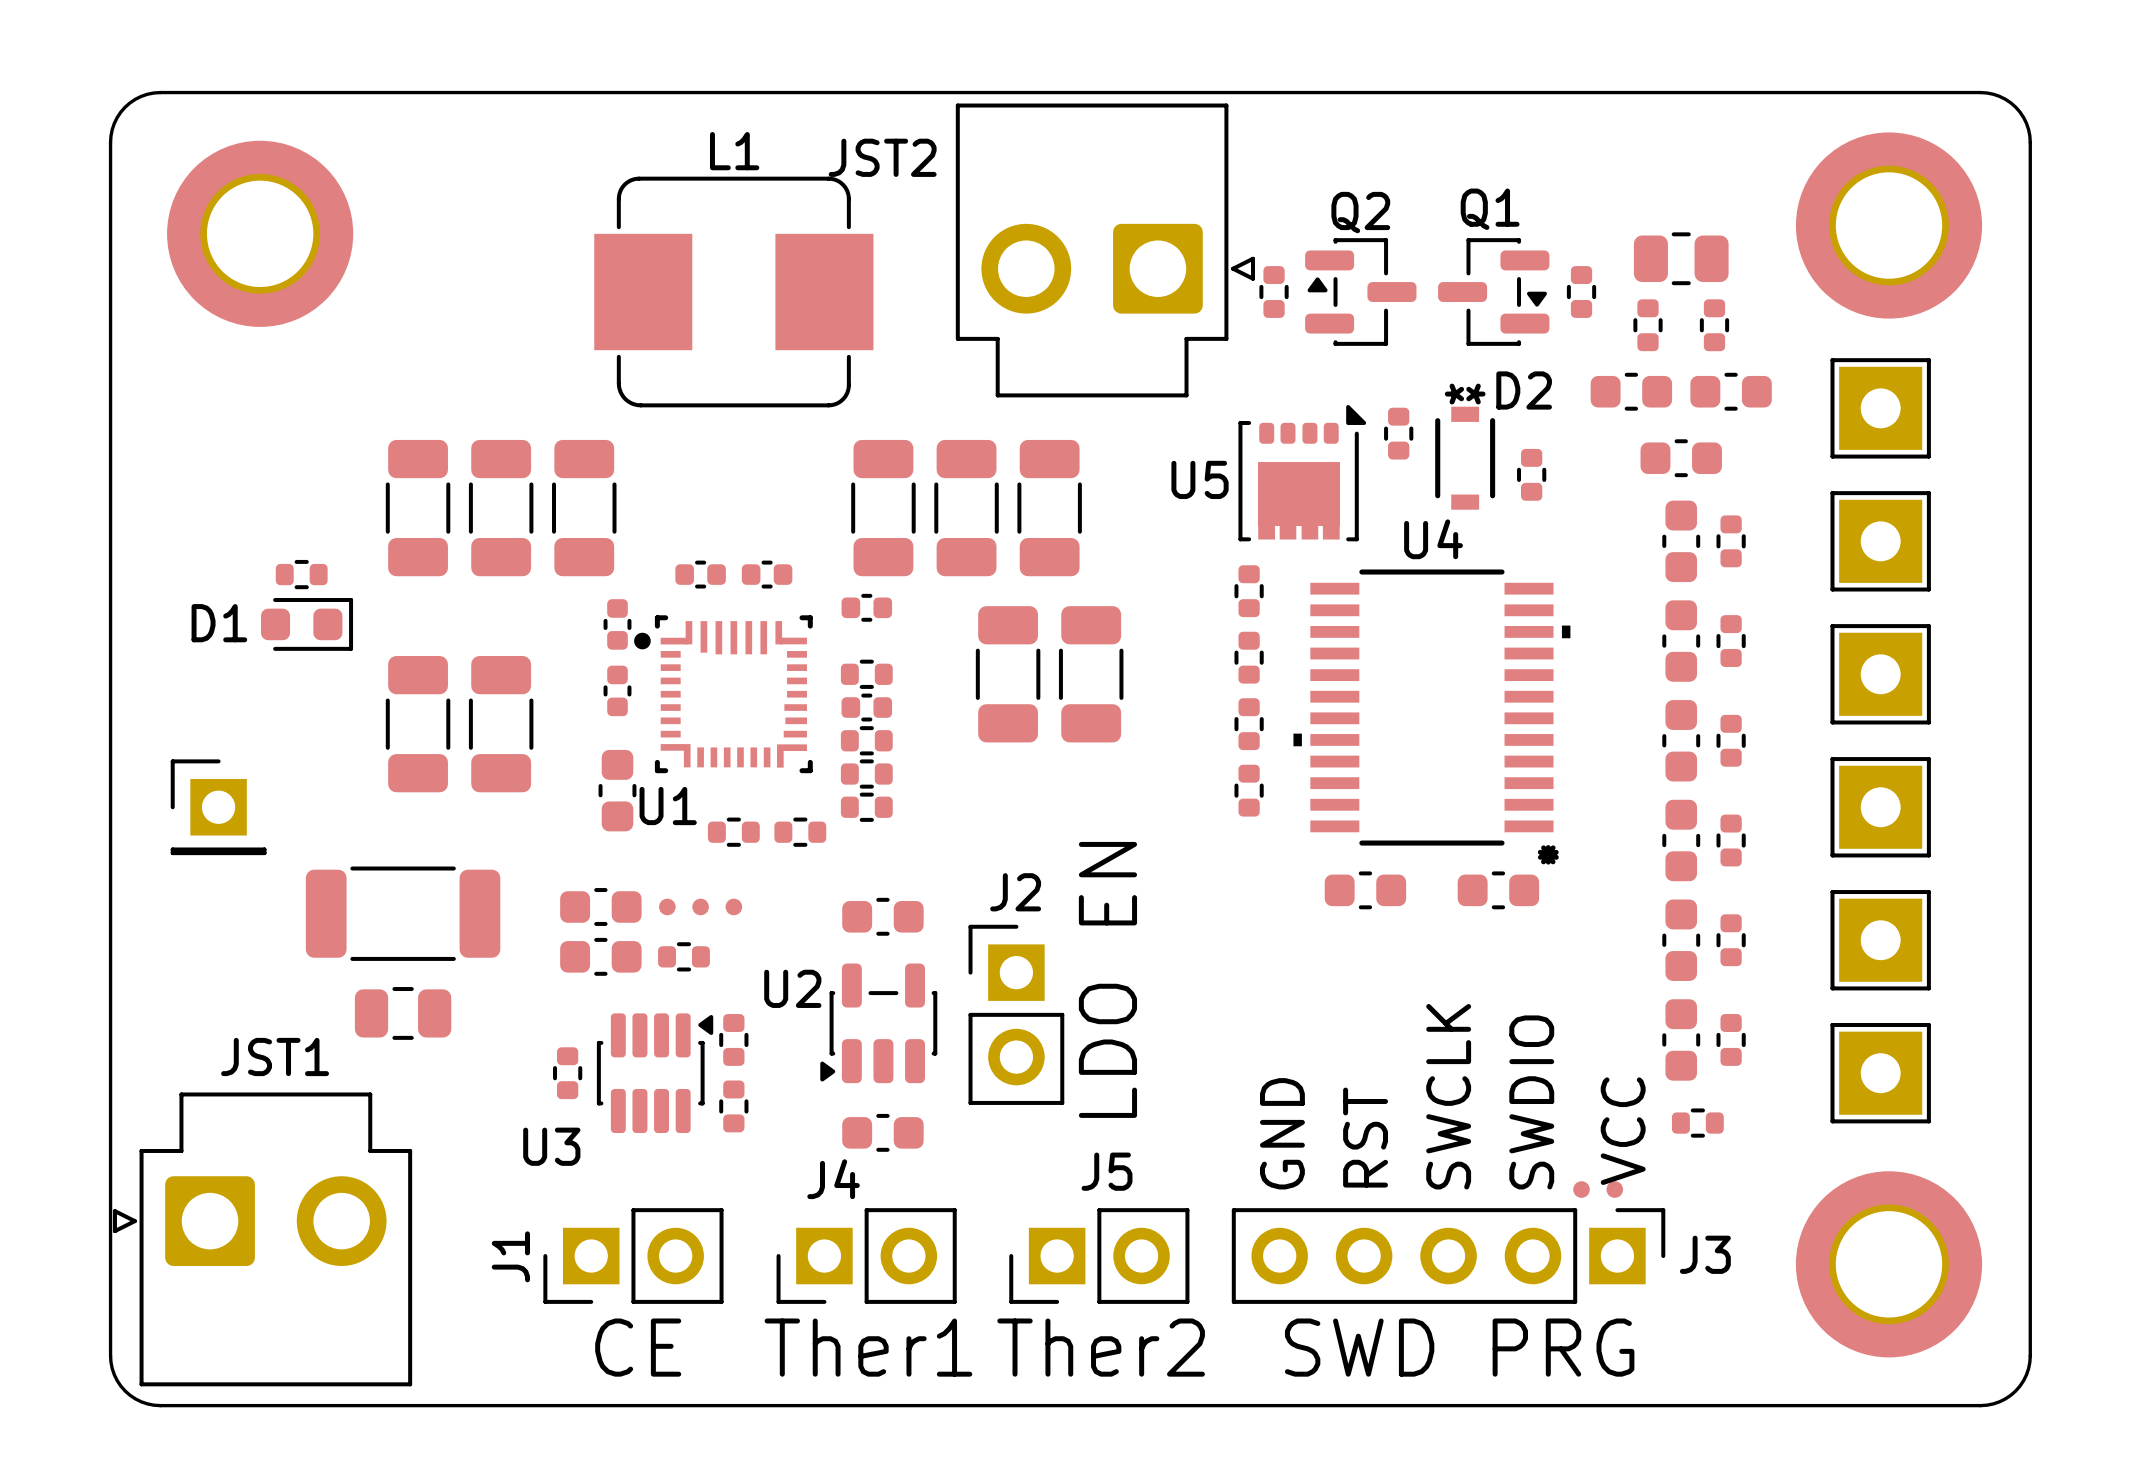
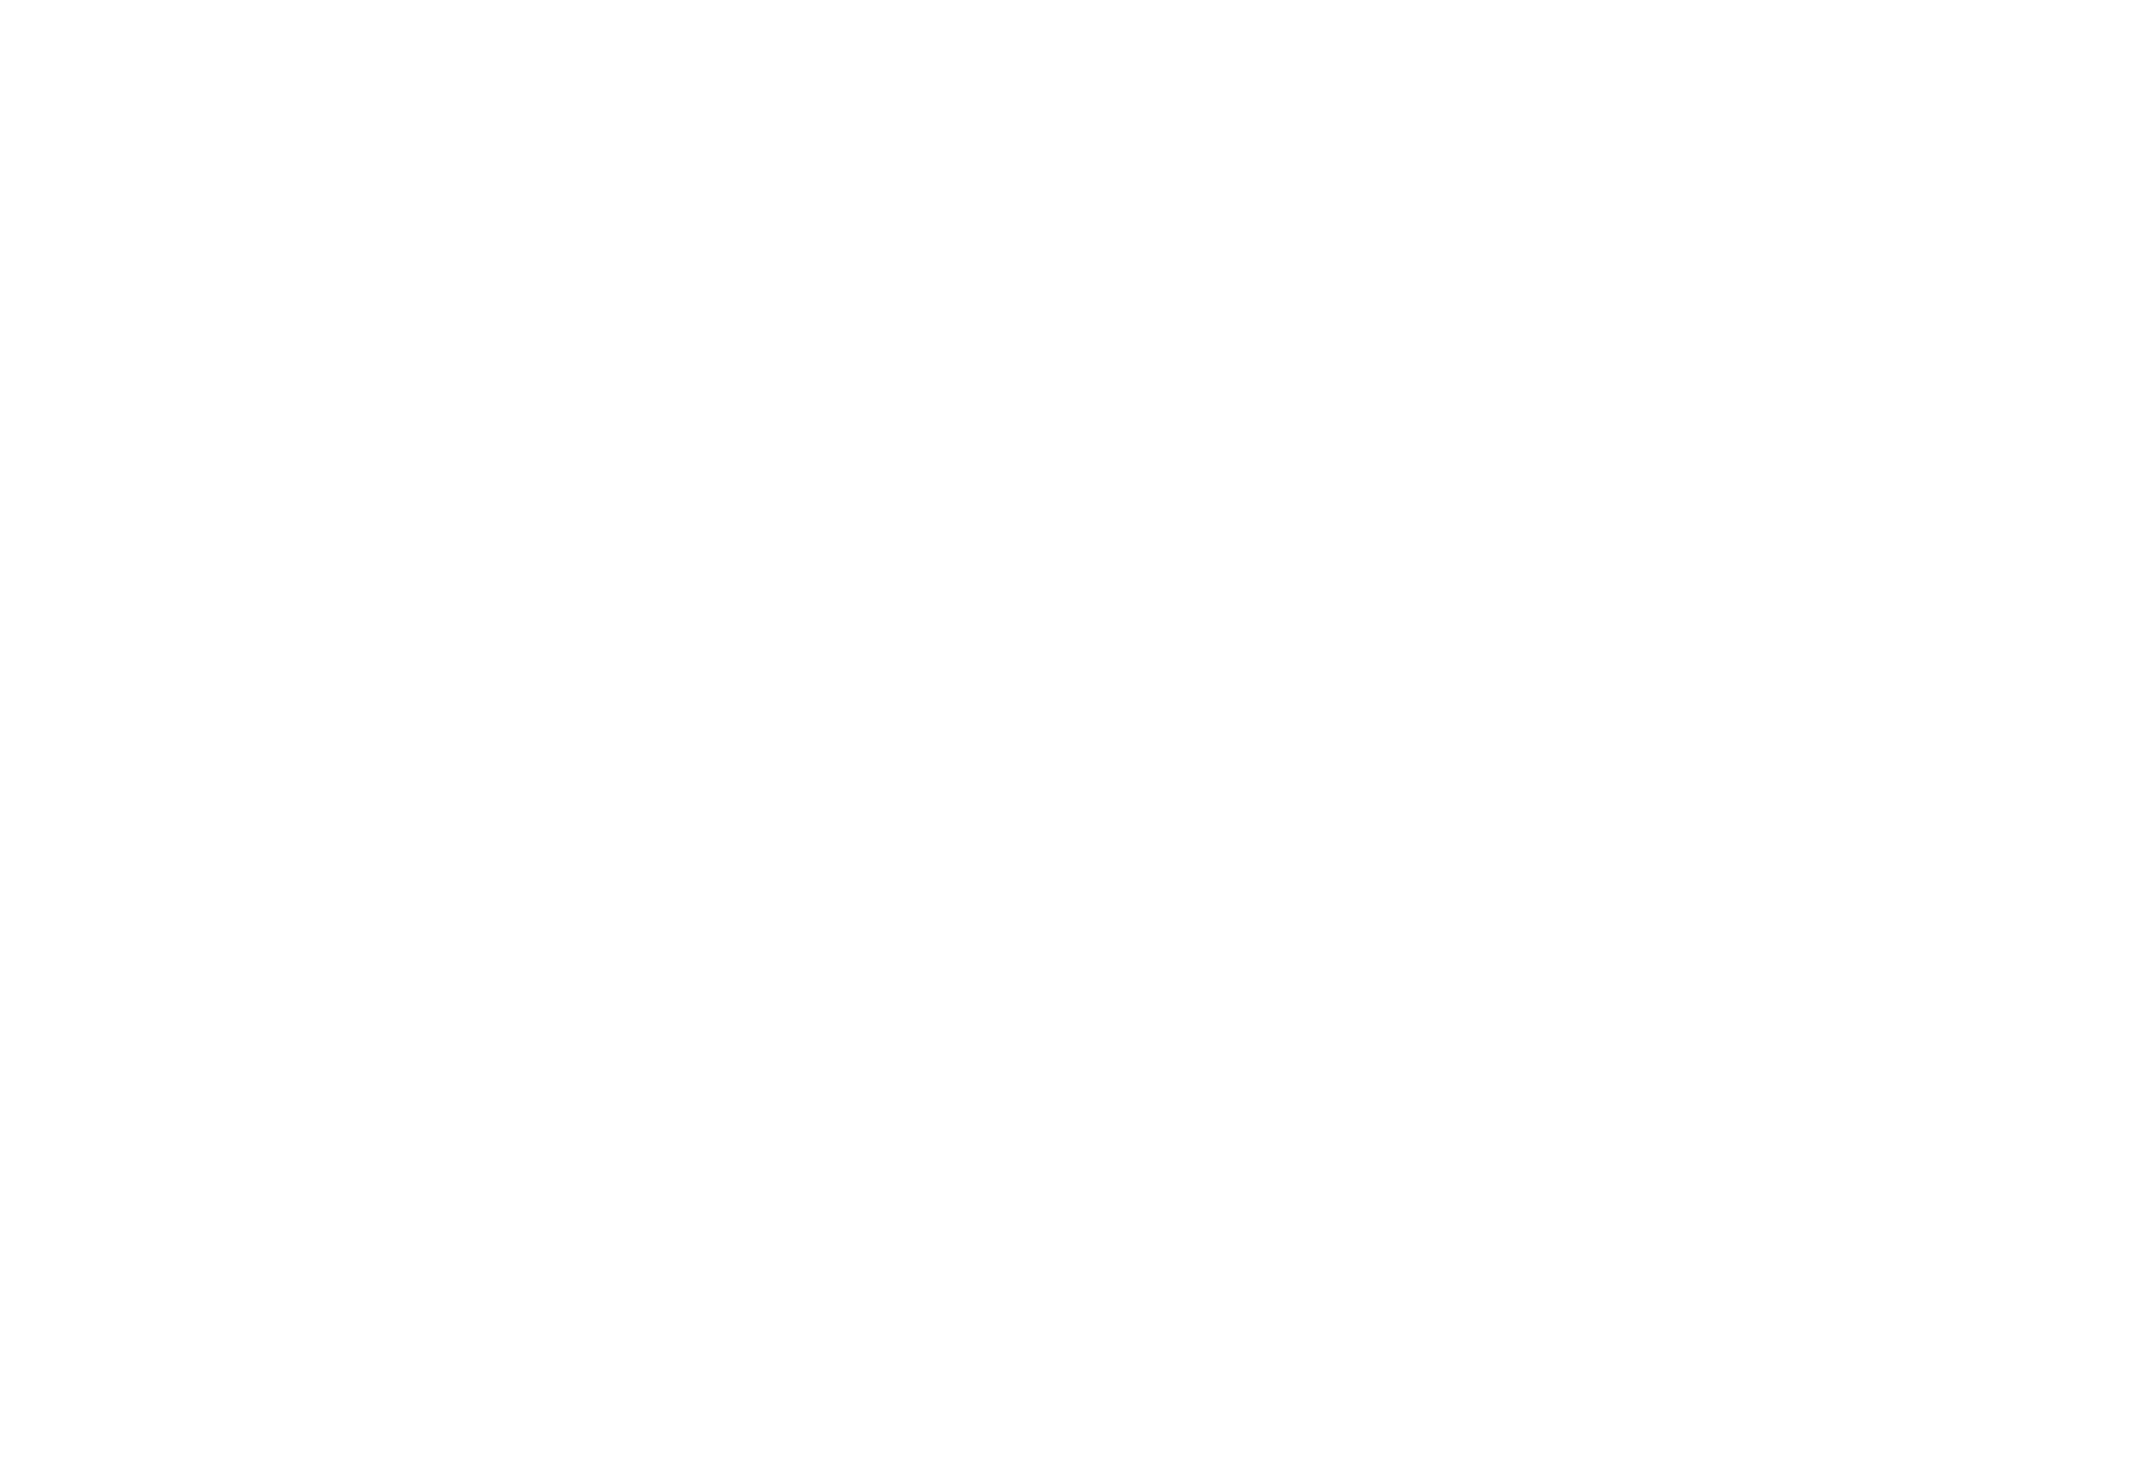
board edge: (160, 92) (1980, 92) (1993, 94) (2010, 102) (2023, 117) (2028, 129) (2030, 142) (2030, 1355) (2026, 1374) (2019, 1386) (2005, 1398) (1993, 1403) (1980, 1405) (160, 1405) (147, 1403) (130, 1395) (120, 1386) (114, 1374) (110, 1355) (110, 142) (114, 123) (125, 107) (141, 96) (160, 92) -> none
part: (1889, 225) -> none
part: (260, 233) -> none
JST2: (1105, 250) -> none
part: (1681, 258) -> none
L1: (733, 292) -> none
part: (1274, 292) -> none
Q2: (1360, 292) -> none
Q1: (1493, 292) -> none
part: (1581, 292) -> none
part: (1648, 325) -> none
part: (1714, 325) -> none
part: (1631, 391) -> none
part: (1731, 391) -> none
part: (1880, 408) -> none
part: (1398, 433) -> none
D2: (1465, 458) -> none
part: (1681, 458) -> none
U5: (1302, 473) -> none
part: (1531, 474) -> none
part: (418, 508) -> none
part: (501, 508) -> none
part: (584, 508) -> none
part: (883, 508) -> none
part: (966, 508) -> none
part: (1049, 508) -> none
part: (1681, 541) -> none
part: (1731, 541) -> none
part: (1880, 541) -> none
part: (301, 574) -> none
part: (700, 574) -> none
part: (767, 574) -> none
part: (1249, 591) -> none
part: (866, 607) -> none
D1: (307, 624) -> none
part: (617, 624) -> none
part: (1681, 641) -> none
part: (1731, 641) -> none
part: (1249, 657) -> none
part: (866, 674) -> none
part: (1008, 674) -> none
part: (1091, 674) -> none
part: (1880, 674) -> none
part: (617, 690) -> none
U1: (723, 694) -> none
part: (866, 707) -> none
U4: (1431, 707) -> none
part: (418, 724) -> none
part: (501, 724) -> none
part: (1249, 724) -> none
part: (866, 740) -> none
part: (1681, 740) -> none
part: (1731, 740) -> none
part: (866, 774) -> none
part: (617, 790) -> none
part: (1249, 790) -> none
part: (218, 807) -> none
part: (866, 807) -> none
part: (1880, 807) -> none
part: (733, 832) -> none
part: (800, 832) -> none
part: (1681, 840) -> none
part: (1731, 840) -> none
part: (1365, 890) -> none
part: (1498, 890) -> none
part: (600, 906) -> none
part: (700, 906) -> none
part: (403, 913) -> none
part: (882, 916) -> none
part: (1681, 940) -> none
part: (1731, 940) -> none
part: (1880, 940) -> none
part: (600, 956) -> none
part: (683, 956) -> none
text: LDO EN (1107, 979) -> none
part: (403, 1013) -> none
J2: (1016, 1014) -> none
U2: (878, 1023) -> none
part: (733, 1039) -> none
part: (1681, 1039) -> none
part: (1731, 1039) -> none
part: (567, 1073) -> none
U3: (655, 1073) -> none
part: (1880, 1073) -> none
text: SWCLK (1448, 1096) -> none
text: SWDIO (1531, 1102) -> none
part: (733, 1106) -> none
part: (1697, 1123) -> none
text: VCC (1623, 1131) -> none
part: (882, 1132) -> none
text: GND (1282, 1133) -> none
text: RST (1365, 1137) -> none
part: (1598, 1189) -> none
JST1: (262, 1239) -> none
J1: (633, 1256) -> none
J4: (866, 1256) -> none
J5: (1099, 1256) -> none
J3: (1448, 1256) -> none
part: (1889, 1264) -> none
text: CE (638, 1347) -> none
text: Ther1 (868, 1347) -> none
text: Ther2 (1101, 1347) -> none
text: SWD PRG (1459, 1347) -> none

